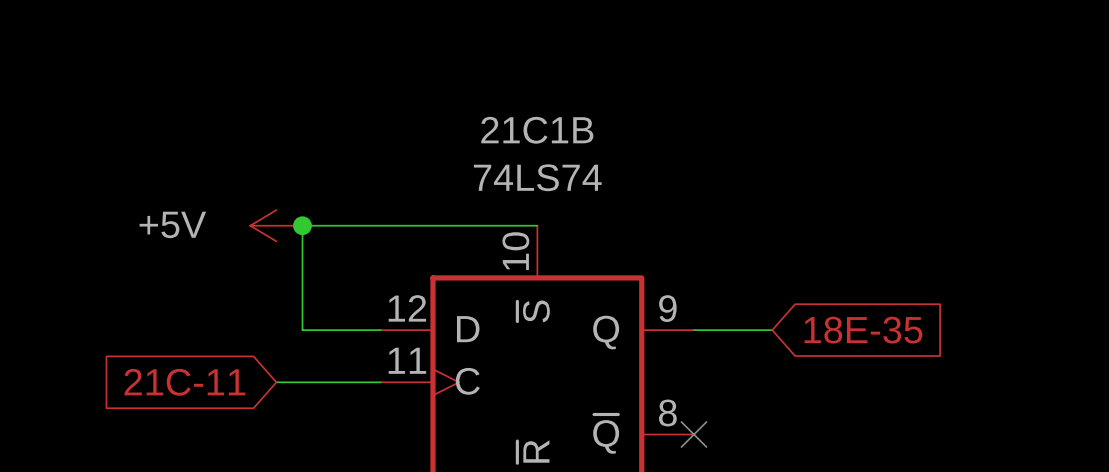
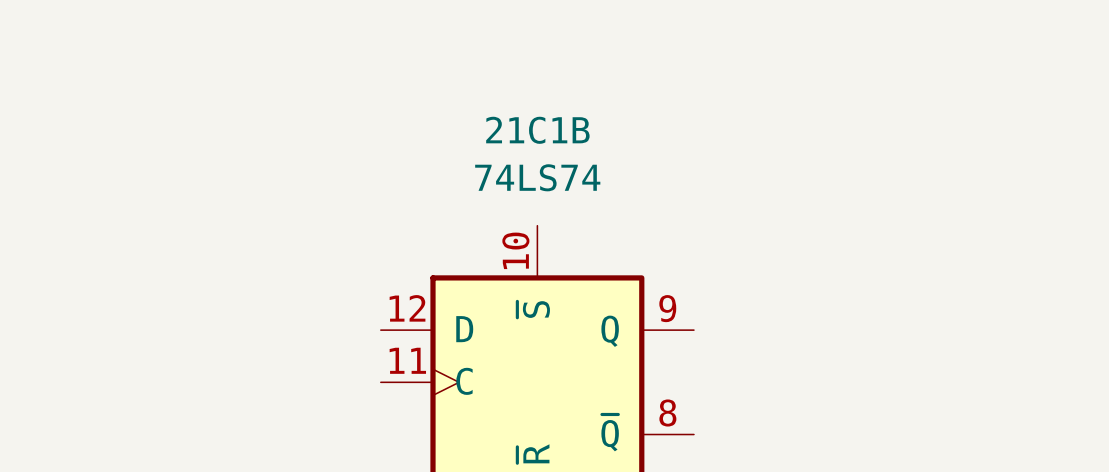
power symbol: +5V (276, 225) -> none
junction: (302, 225) -> none
wire: (537, 225) (302, 225) (302, 330) (380, 330) -> none
wire: (693, 330) (772, 330) -> none
global label: 18E-35 (863, 330) -> none
global label: 21C-11 (184, 382) -> none
wire: (276, 382) (380, 382) -> none
no-connect mark: (693, 434) -> none

